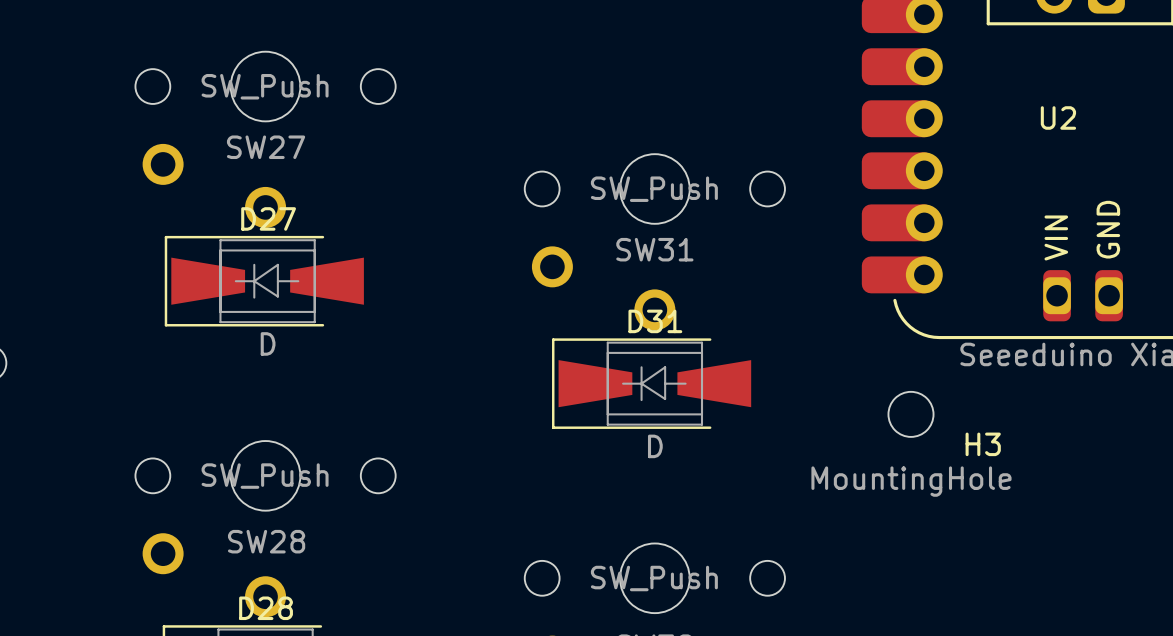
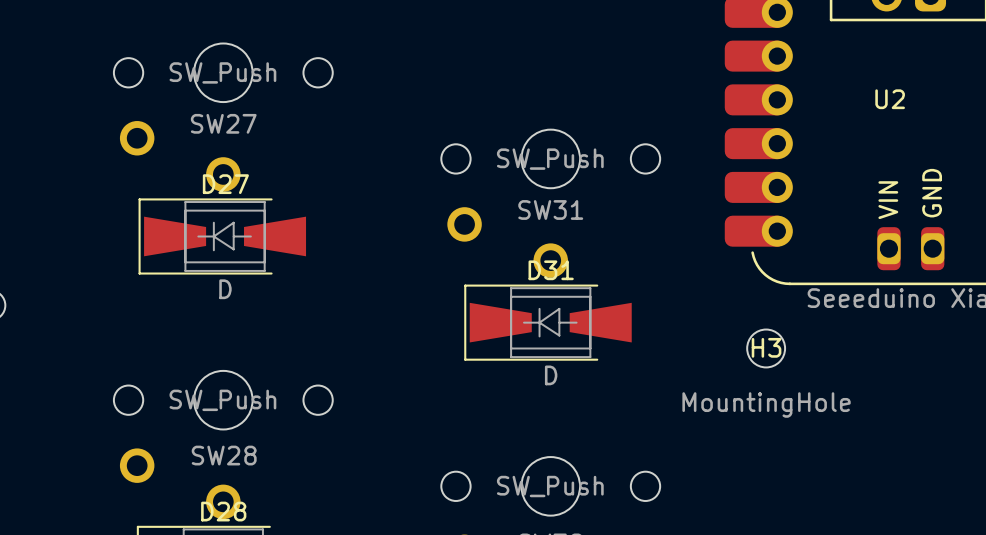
H3 name position: H3 (983, 444) -> H3 (766, 347)

